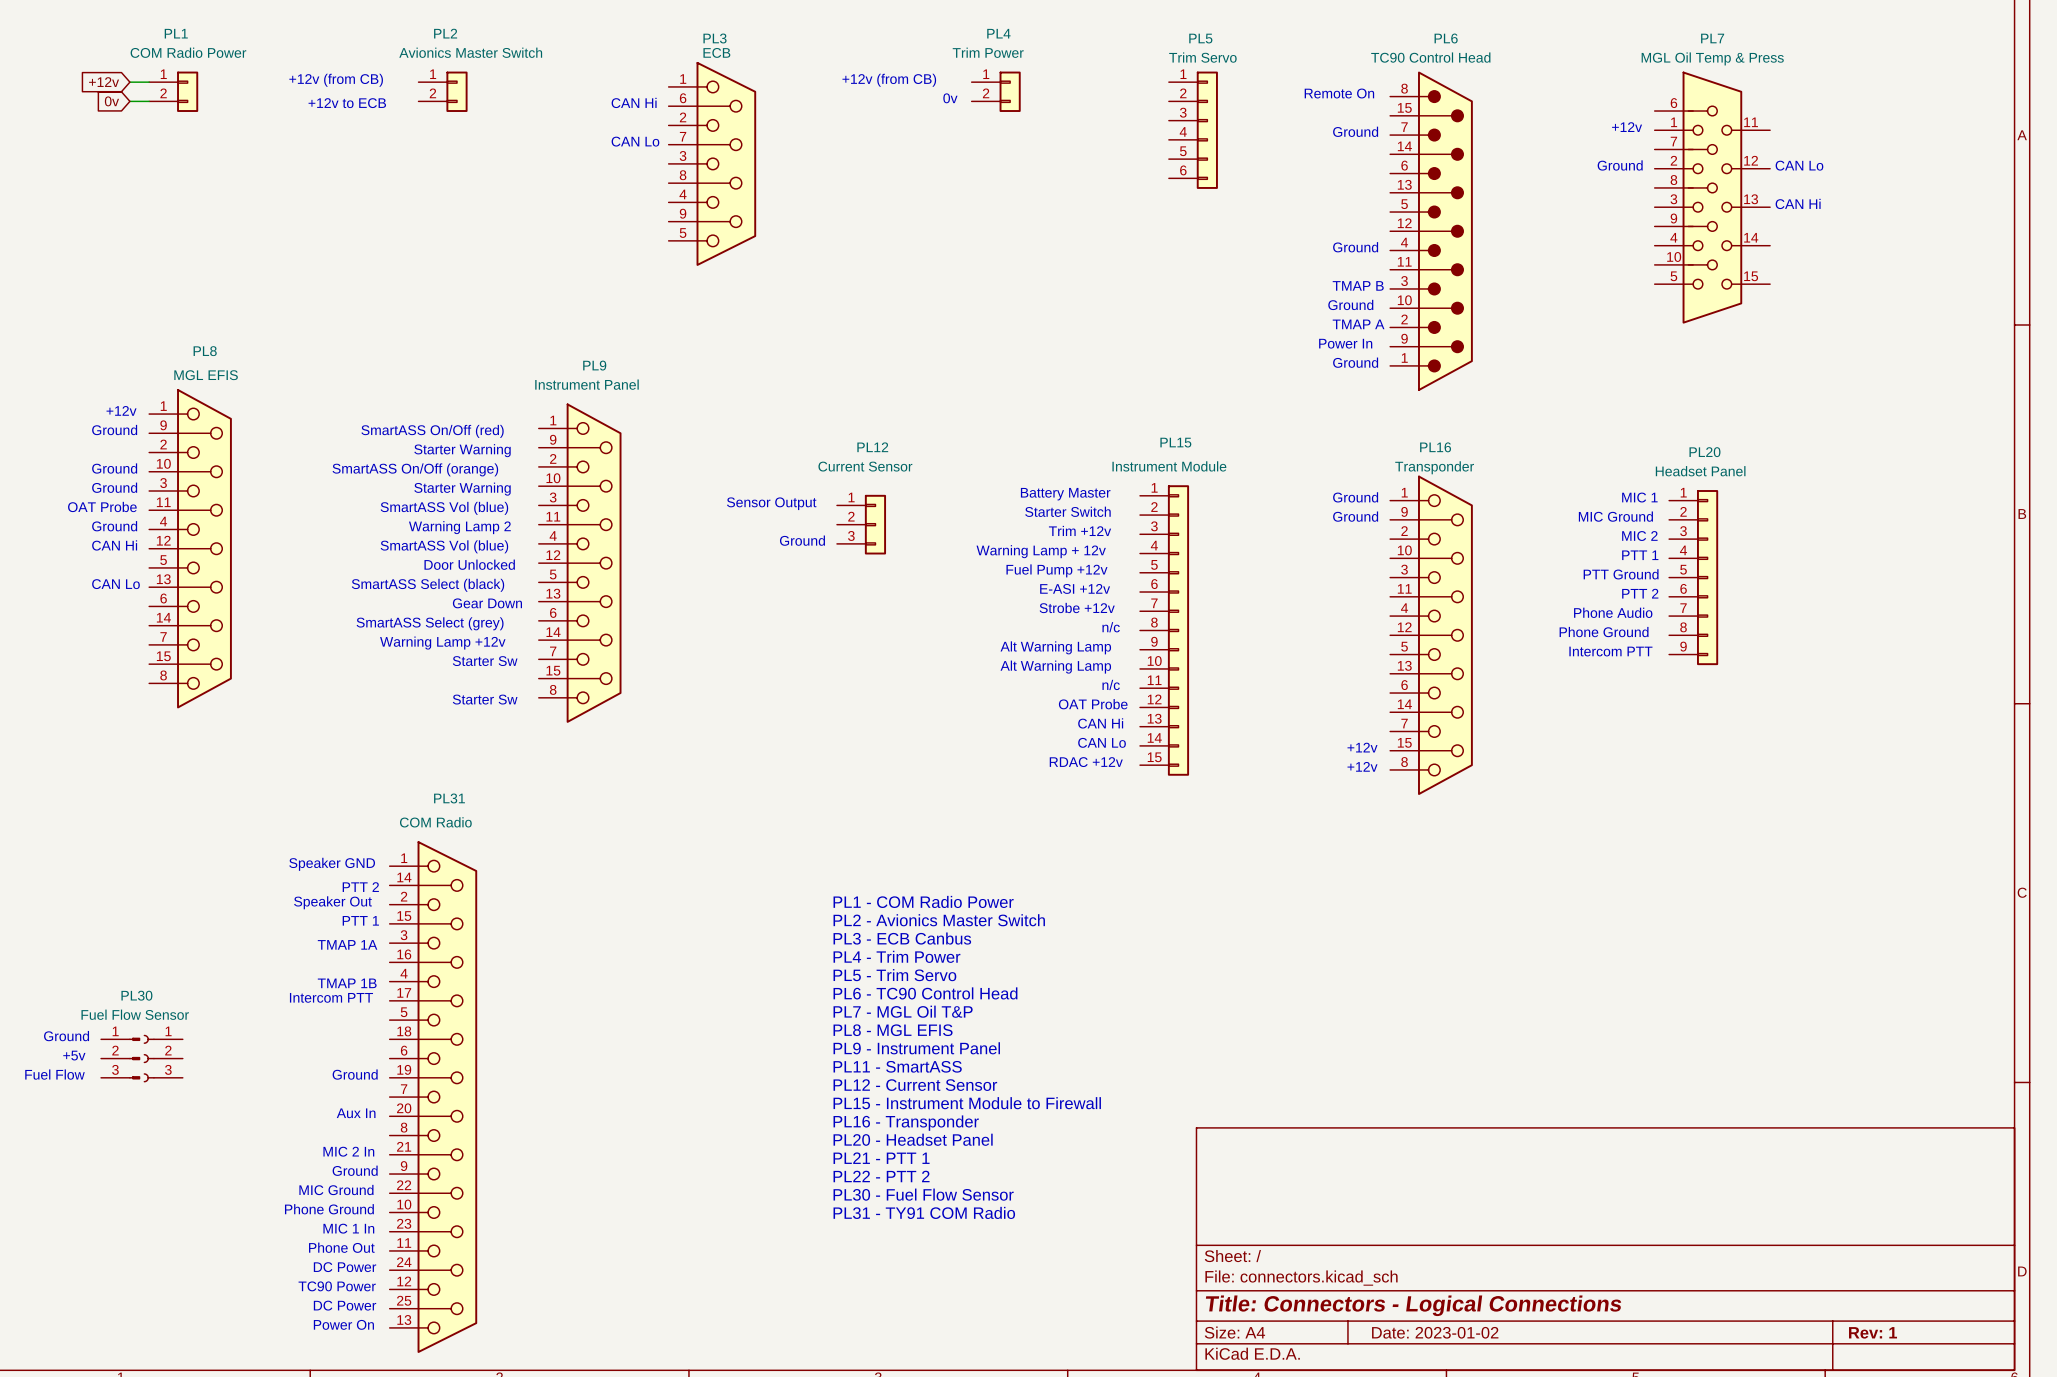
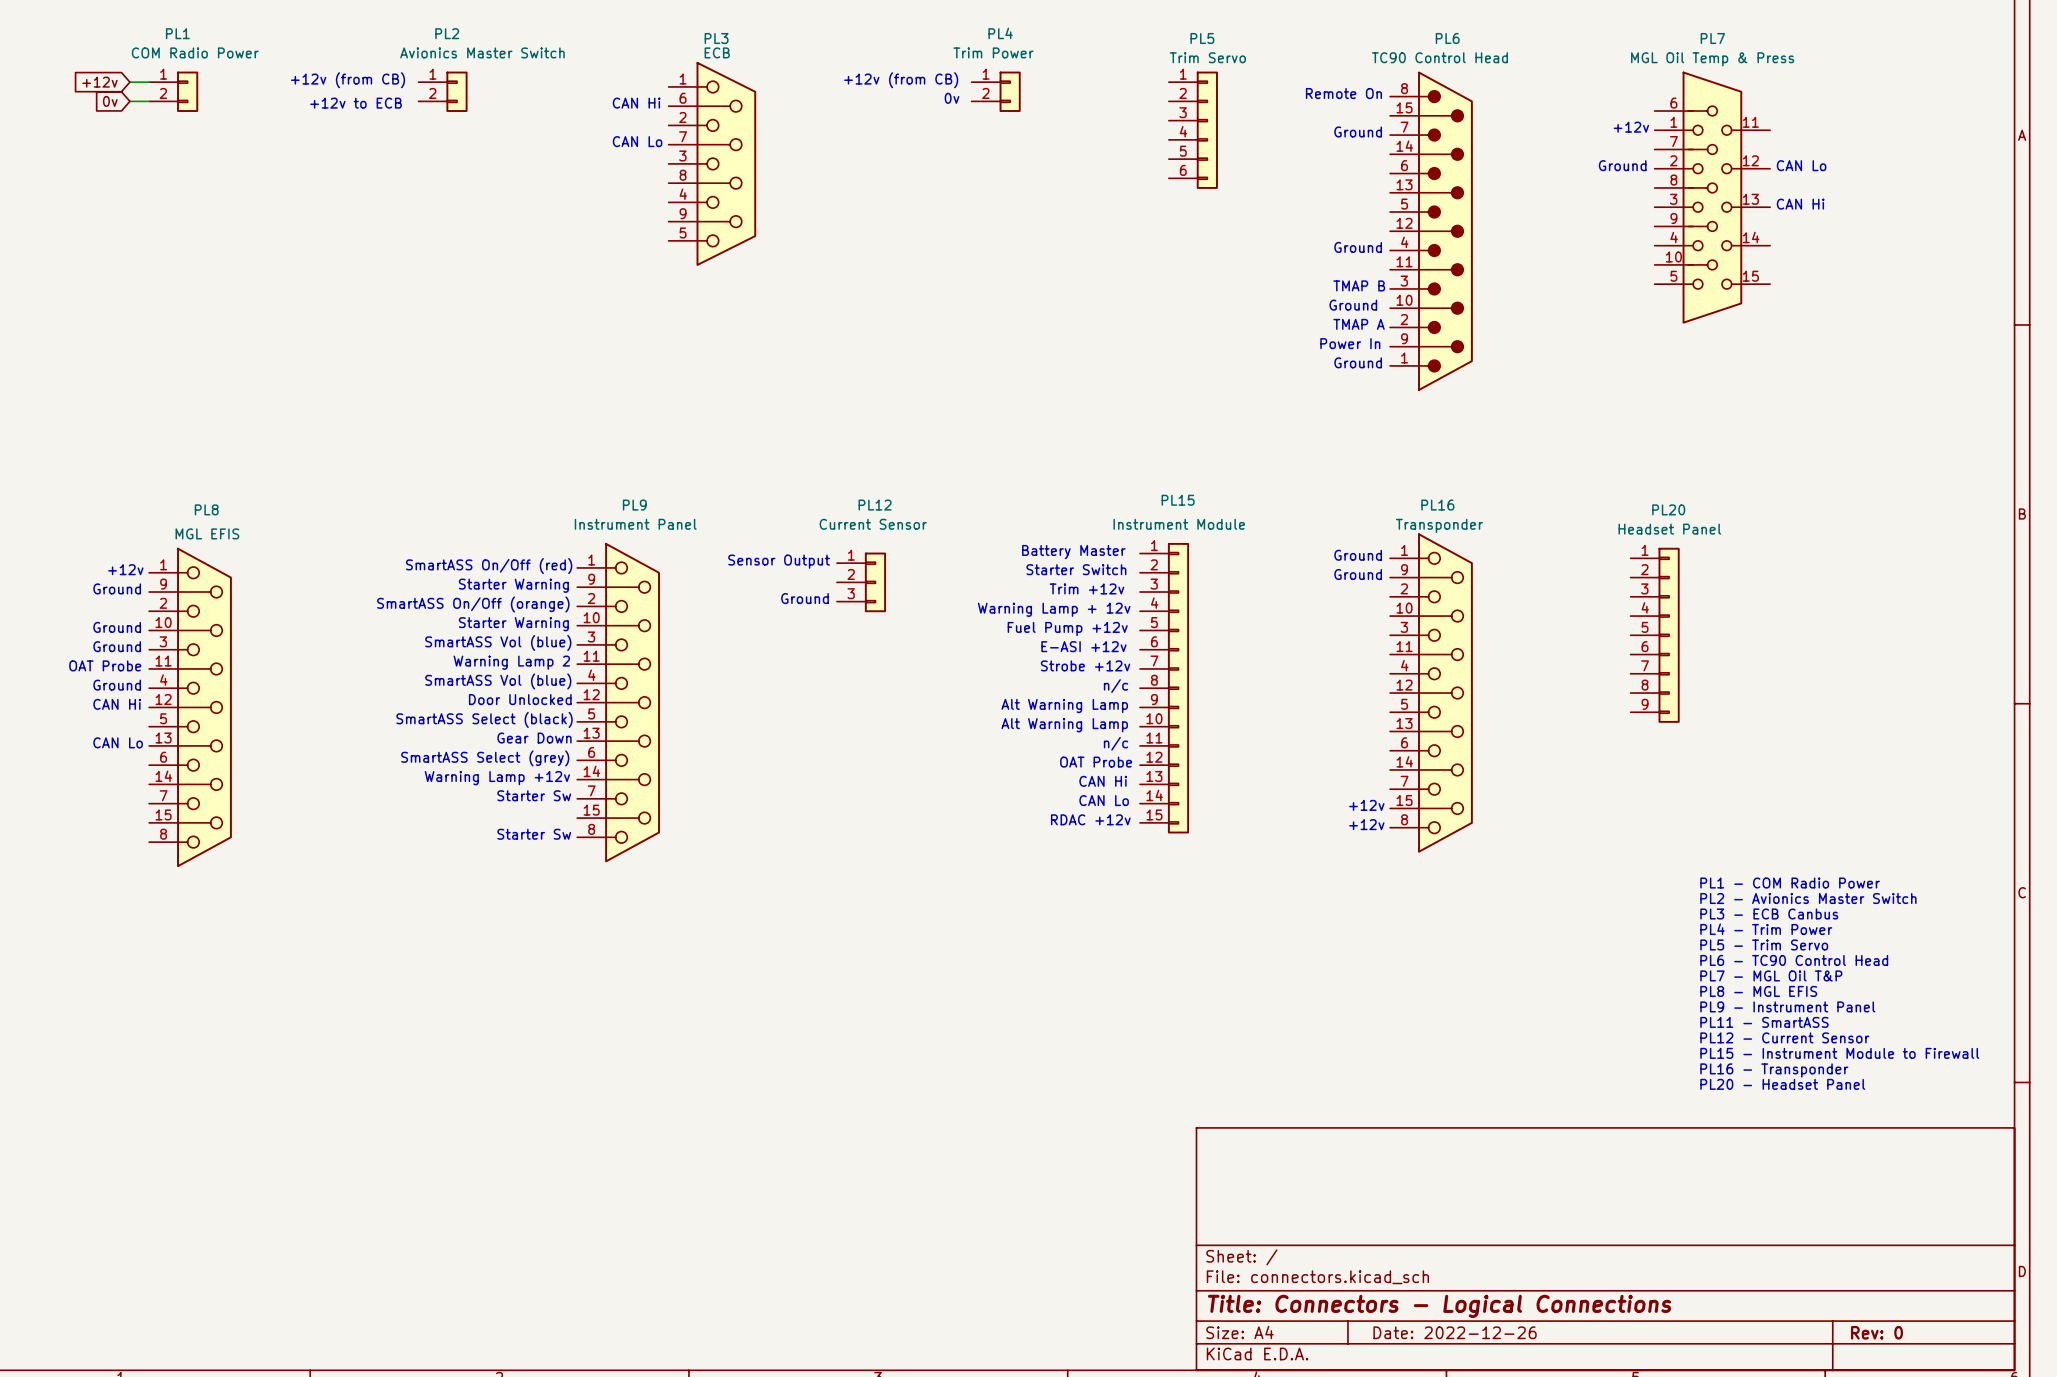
text position: +12v (121, 410) -> +12v (125, 569)
text: Ground (114, 430) -> none
text position: SmartASS On/Off (red) (432, 431) -> SmartASS On/Off (red) (489, 566)
text: Starter Warning (462, 450) -> none
text: Ground (114, 468) -> none
text position: SmartASS On/Off (orange) (415, 469) -> SmartASS On/Off (orange) (473, 604)
text: Ground (114, 487) -> none
text: Starter Warning (462, 489) -> none
text position: Battery Master (1065, 494) -> Battery Master (1073, 552)
text: Ground (1355, 497) -> none
text: MIC 1 (1639, 497) -> none
text position: Sensor Output (771, 503) -> Sensor Output (779, 561)
text position: OAT Probe (102, 506) -> OAT Probe (105, 665)
text: SmartASS Vol (blue) (444, 508) -> none
text position: Starter Switch (1067, 511) -> Starter Switch (1076, 569)
text: Ground (1355, 516) -> none
text: MIC Ground (1615, 516) -> none
PL12 position: (861, 524) -> (861, 582)
text: Ground (114, 526) -> none
text: Warning Lamp 2 (459, 527) -> none
text position: Trim +12v (1080, 530) -> Trim +12v (1086, 588)
text: MIC 2 (1639, 536) -> none
text position: Ground (802, 540) -> Ground (804, 598)
text position: CAN Hi (114, 545) -> CAN Hi (117, 704)
text: SmartASS Vol (blue) (444, 546) -> none
PL8 position: (190, 548) -> (190, 707)
text position: Warning Lamp + 12v (1041, 551) -> Warning Lamp + 12v (1054, 609)
text: none -> Ground (1358, 555)
text: PTT 1 (1640, 555) -> none
PL9 position: (580, 563) -> (618, 702)
text position: Door Unlocked (469, 564) -> Door Unlocked (520, 699)
text position: Fuel Pump +12v (1056, 570) -> Fuel Pump +12v (1067, 629)
text: none -> Ground (1358, 574)
text: PTT Ground (1621, 574) -> none
PL20 position: (1693, 577) -> (1655, 635)
text position: CAN Lo (115, 584) -> CAN Lo (118, 742)
text position: SmartASS Select (black) (427, 585) -> SmartASS Select (black) (484, 719)
text: none -> Starter Warning (513, 585)
text: none -> Ground (117, 588)
text position: E-ASI +12v (1075, 588) -> E-ASI +12v (1083, 646)
text: PTT 2 (1640, 593) -> none
text position: Gear Down (487, 603) -> Gear Down (534, 738)
text position: Strobe +12v (1077, 607) -> Strobe +12v (1085, 665)
text: Phone Audio (1613, 612) -> none
text position: SmartASS Select (grey) (430, 623) -> SmartASS Select (grey) (485, 758)
text: none -> Starter Warning (513, 624)
text: none -> Ground (117, 627)
text position: n/c (1111, 627) -> n/c (1116, 743)
PL15 position: (1164, 630) -> (1164, 688)
text: Phone Ground (1604, 632) -> none
PL16 position: (1431, 635) -> (1431, 693)
text position: Warning Lamp +12v (442, 643) -> Warning Lamp +12v (497, 778)
text: none -> SmartASS Vol (blue) (498, 642)
text: none -> Ground (117, 646)
text: Alt Warning Lamp (1055, 647) -> none
text: Intercom PTT (1610, 651) -> none
text: Starter Sw (485, 661) -> Warning Lamp 2 (511, 662)
text: Alt Warning Lamp (1055, 667) -> none
text: none -> SmartASS Vol (blue) (498, 681)
text: none -> Ground (117, 685)
text: Starter Sw (485, 699) -> none
text position: OAT Probe (1093, 704) -> OAT Probe (1096, 762)
text: none -> Alt Warning Lamp (1064, 705)
text position: CAN Hi (1100, 723) -> CAN Hi (1103, 781)
text: none -> Alt Warning Lamp (1064, 725)
text position: CAN Lo (1102, 742) -> CAN Lo (1104, 800)
text: +12v (1362, 747) -> none
text position: RDAC +12v (1086, 762) -> RDAC +12v (1090, 819)
text: +12v (1362, 766) -> none
text: none -> Starter Sw (534, 795)
text: none -> +12v (1366, 805)
text: none -> +12v (1366, 824)
text: none -> Starter Sw (534, 834)
text: Speaker GND (332, 864) -> none
text: none -> PL1 - COM Radio Power (1790, 883)
text: PTT 2 (360, 887) -> none
text: none -> PL2 - Avionics Master Switch (1808, 898)
text: PL1 - COM Radio Power (923, 901) -> none
text: Speaker Out (332, 902) -> none
text: none -> PL3 - ECB Canbus (1769, 913)
text: PTT 1 (360, 920) -> none
text: PL2 - Avionics Master Switch (939, 920) -> none
text: none -> PL4 - Trim Power (1766, 929)
text: PL3 - ECB Canbus (902, 938) -> none
text: TMAP 1A (347, 944) -> none
text: none -> PL5 - Trim Servo (1764, 944)
text: PL4 - Trim Power (896, 956) -> none
text: none -> PL6 - TC90 Control Head (1794, 960)
text: PL5 - Trim Servo (894, 975) -> none
text: none -> PL7 - MGL Oil T&P (1771, 975)
text: TMAP 1B (347, 983) -> none
text: none -> PL8 - MGL EFIS (1758, 991)
text: PL6 - TC90 Control Head (925, 993) -> none
text: Intercom PTT (331, 997) -> none
text: none -> PL9 - Instrument Panel (1787, 1006)
text: PL7 - MGL Oil T&P (903, 1011) -> none
text: none -> PL11 - SmartASS (1764, 1022)
text: PL8 - MGL EFIS (893, 1030) -> none
text: Ground (66, 1036) -> none
text: none -> PL12 - Current Sensor (1784, 1037)
text: PL9 - Instrument Panel (916, 1048) -> none
text: none -> PL15 - Instrument Module to Firewall (1839, 1053)
text: +5v (74, 1055) -> none
PL30: Fuel Flow Sensor (120, 1058) -> none
part: (163, 1058) -> none
text: PL11 - SmartASS (897, 1066) -> none
text: none -> PL16 - Transponder (1774, 1070)
text: Fuel Flow (54, 1074) -> none
text: Ground (355, 1074) -> none
text: none -> PL20 - Headset Panel (1782, 1084)
text: PL12 - Current Sensor (915, 1085) -> none
PL31: COM Radio (433, 1097) -> none
text: PL15 - Instrument Module to Firewall (967, 1103) -> none
text: Aux In (356, 1113) -> none
text: PL16 - Transponder (906, 1123) -> none
text: PL20 - Headset Panel (913, 1139) -> none
text: MIC 2 In (348, 1151) -> none
text: PL21 - PTT 1 (881, 1158) -> none
text: Ground (355, 1170) -> none
text: PL22 - PTT 2 (881, 1176) -> none
text: MIC Ground (336, 1189) -> none
text: PL30 - Fuel Flow Sensor (923, 1194) -> none
text: Phone Ground (329, 1209) -> none
text: PL31 - TY91 COM Radio (924, 1212) -> none
text: MIC 1 In (348, 1228) -> none
text: Phone Out (341, 1247) -> none
text: DC Power (345, 1267) -> none
text: TC90 Power (337, 1286) -> none
text: DC Power (345, 1305) -> none
text: Power On (343, 1324) -> none
title block: Date: 2023-01-02 (1435, 1332) -> Date: 2022-12-26 (1455, 1332)
title block: Rev: 1 (1873, 1332) -> Rev: 0 (1876, 1332)

